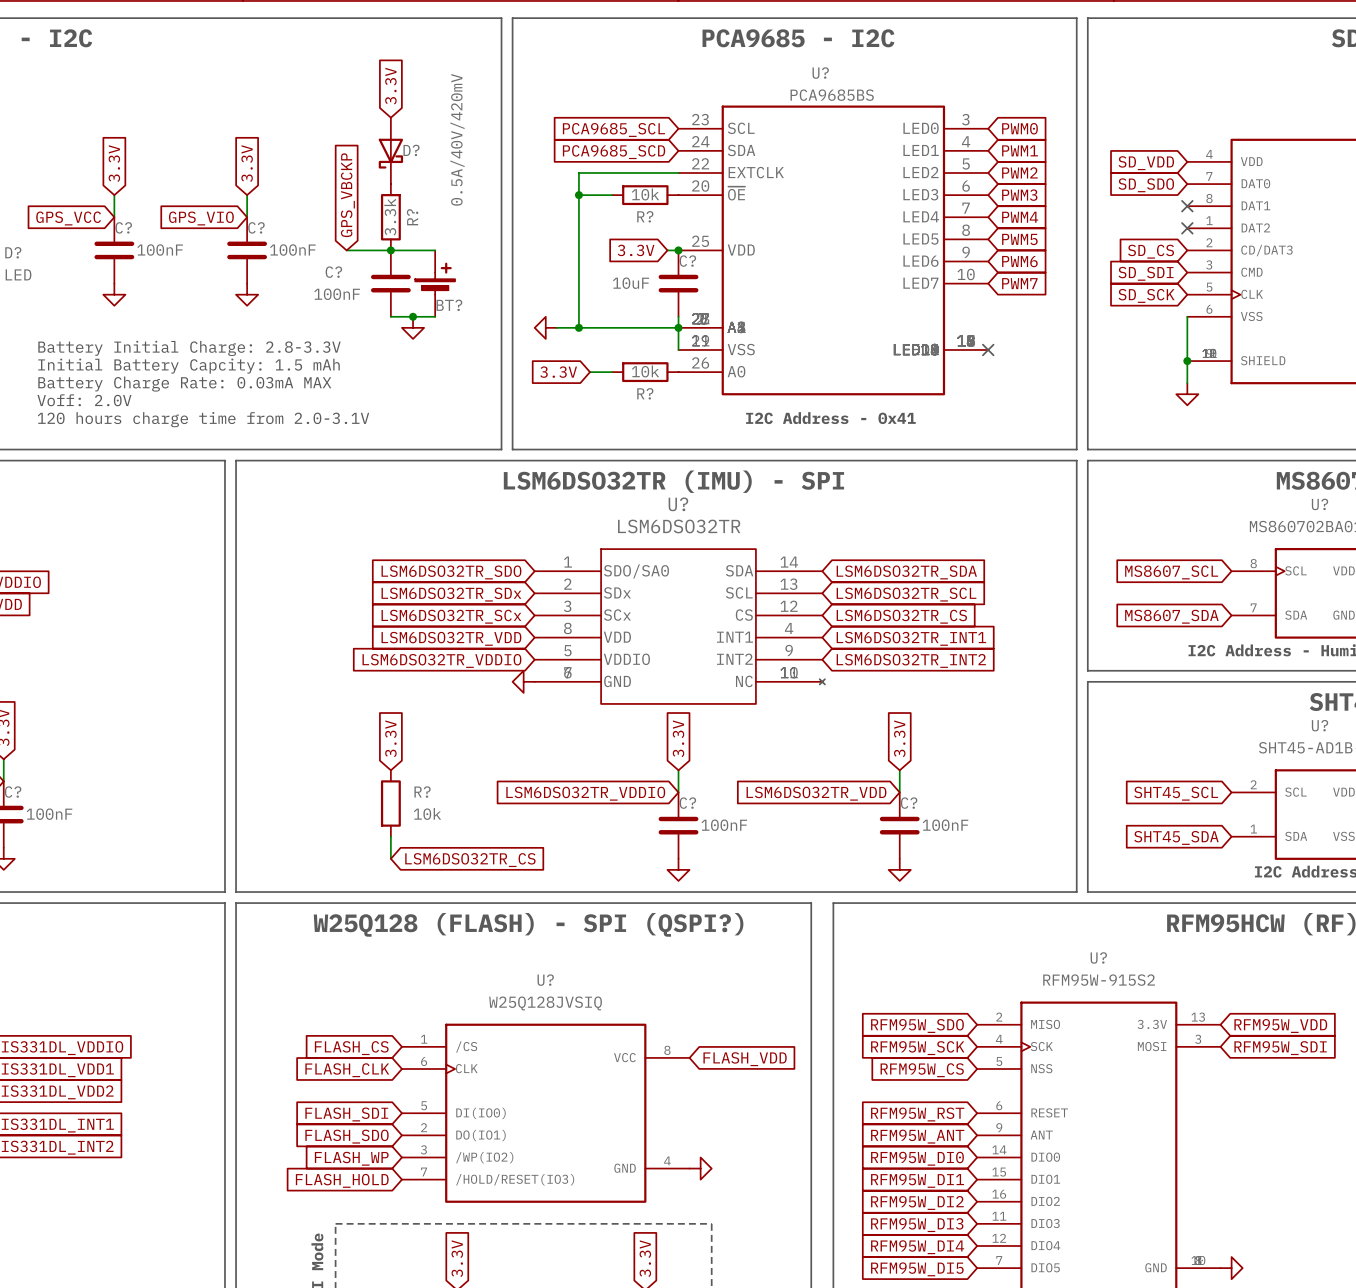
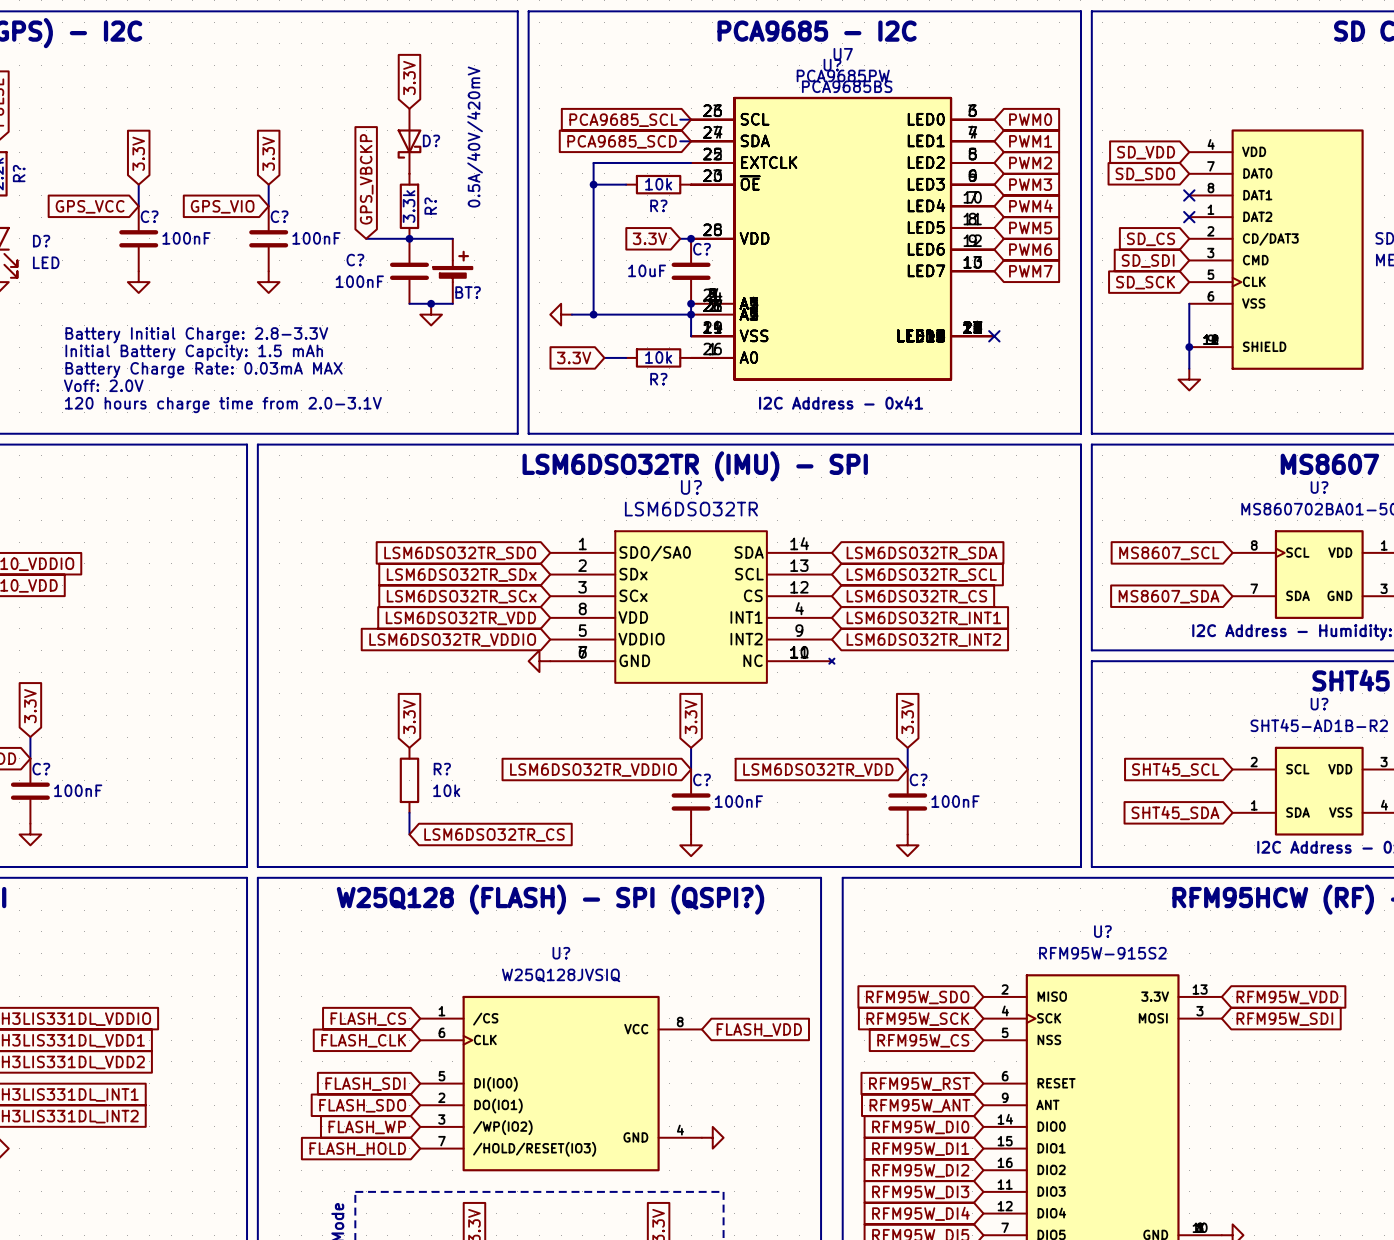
wire: none -> (680, 119) (691, 119)
wire: none -> (680, 141) (691, 141)
U7: none -> PCA9685PW (842, 238)
junction: none -> (691, 303)

